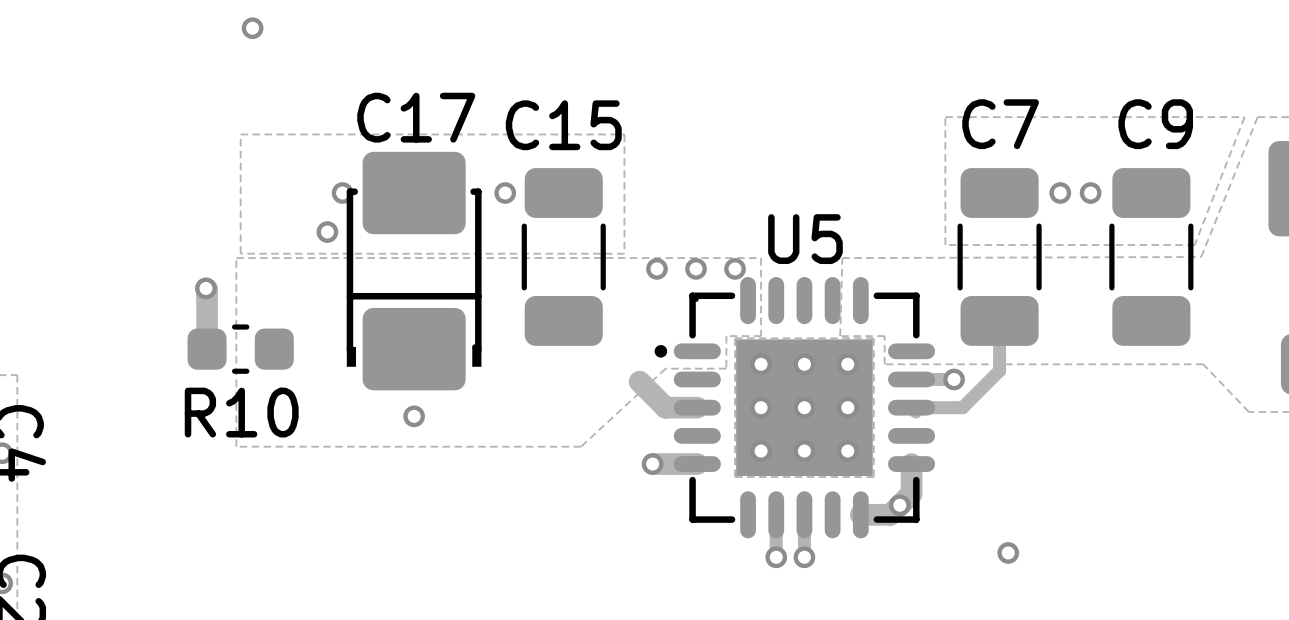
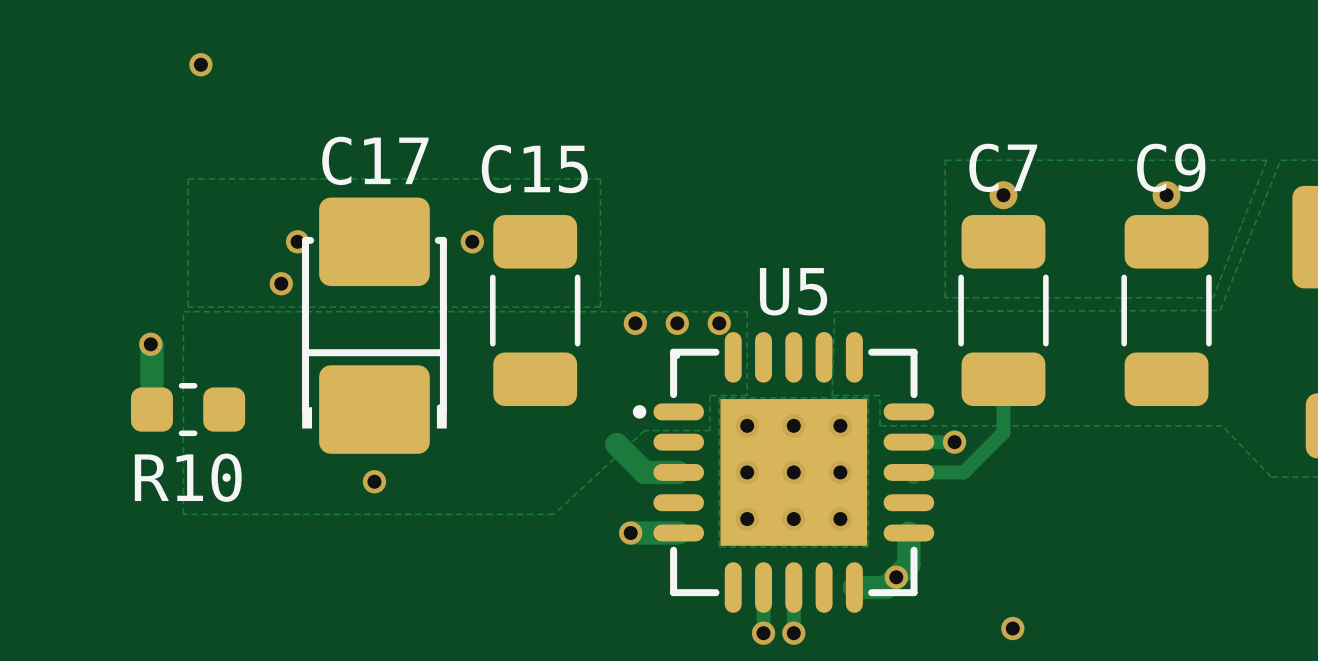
via: none -> (1003, 195)
via: none -> (1166, 195)
via: (1060, 193) -> none
via: (1090, 193) -> none

